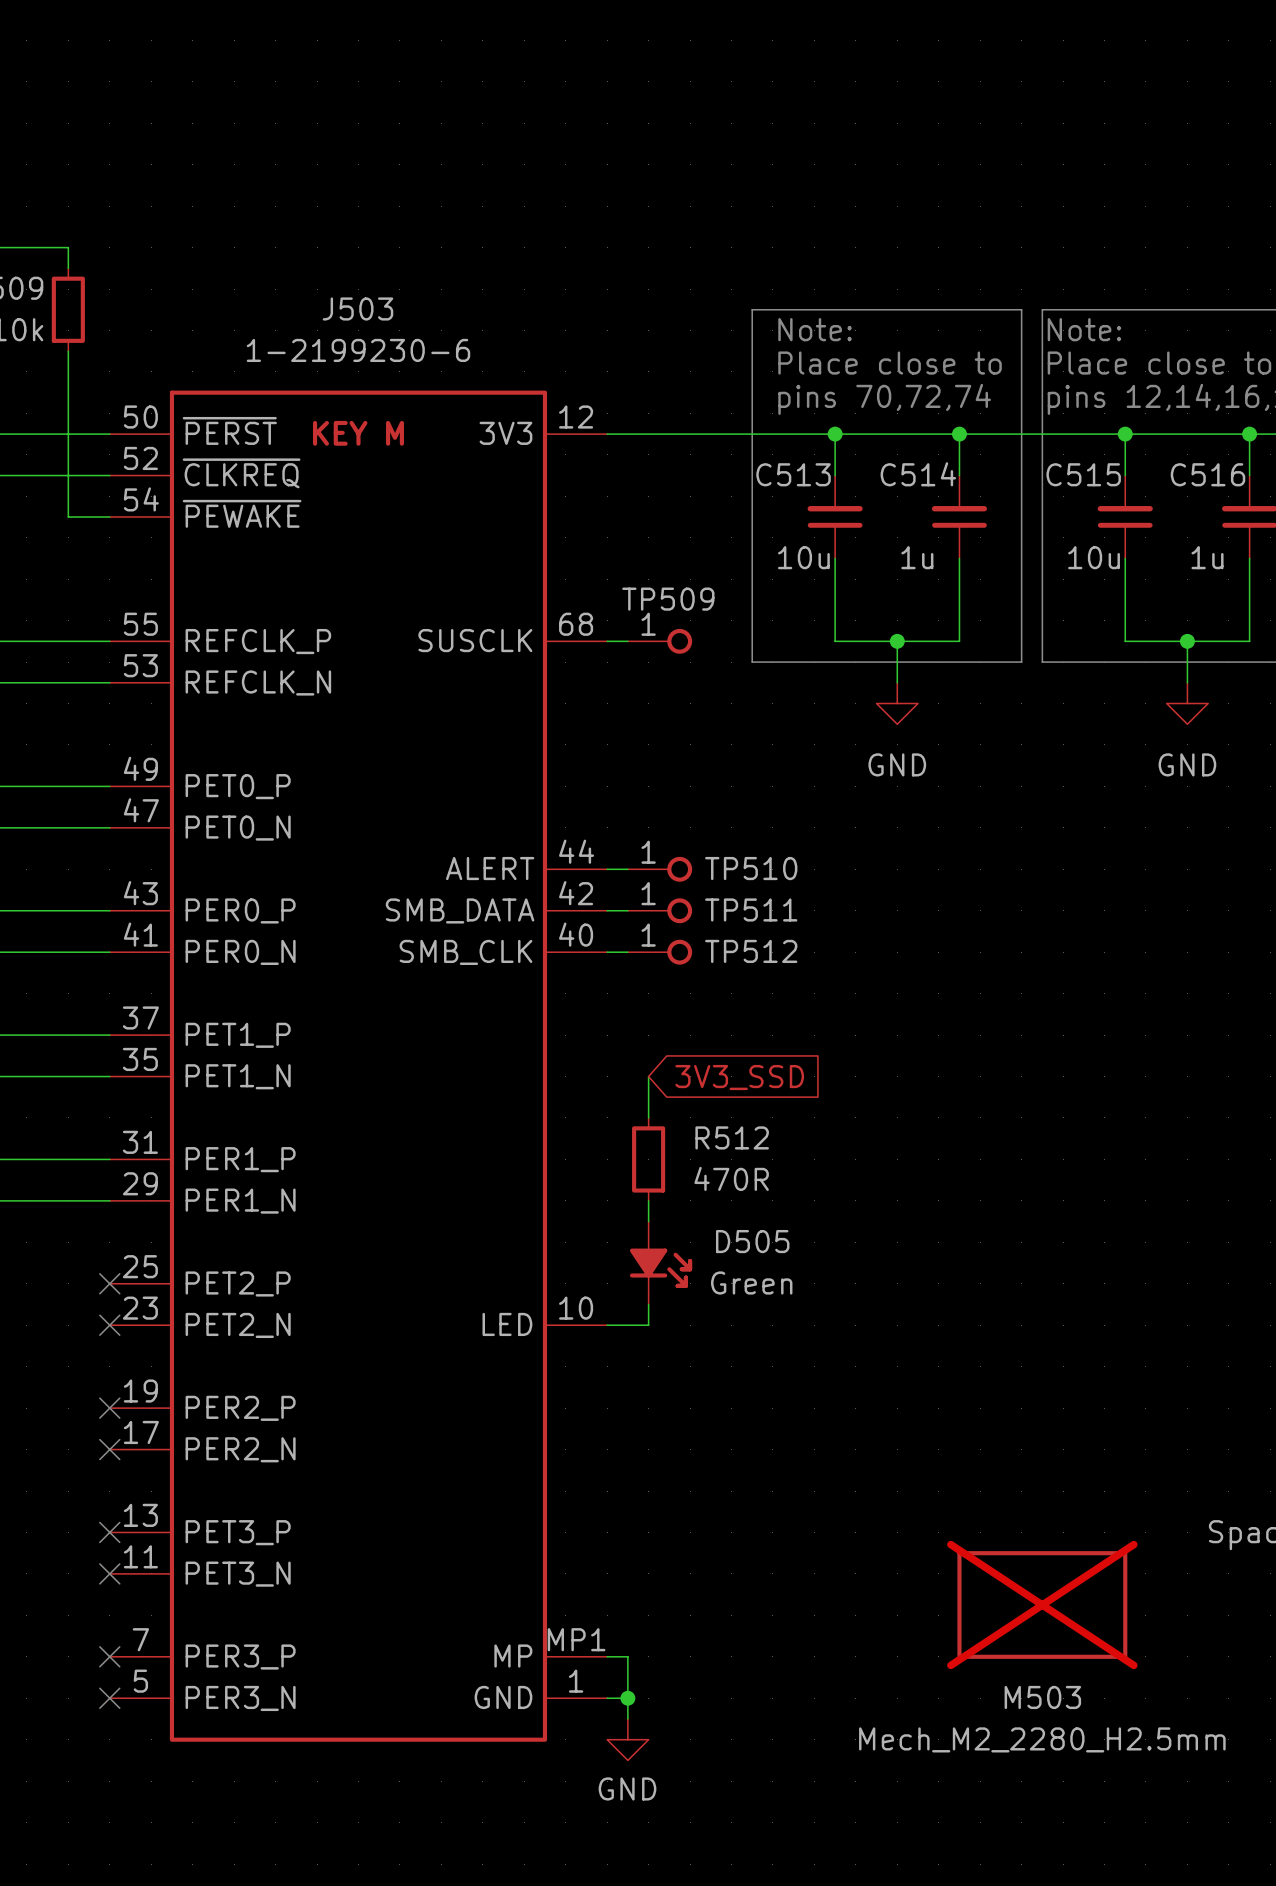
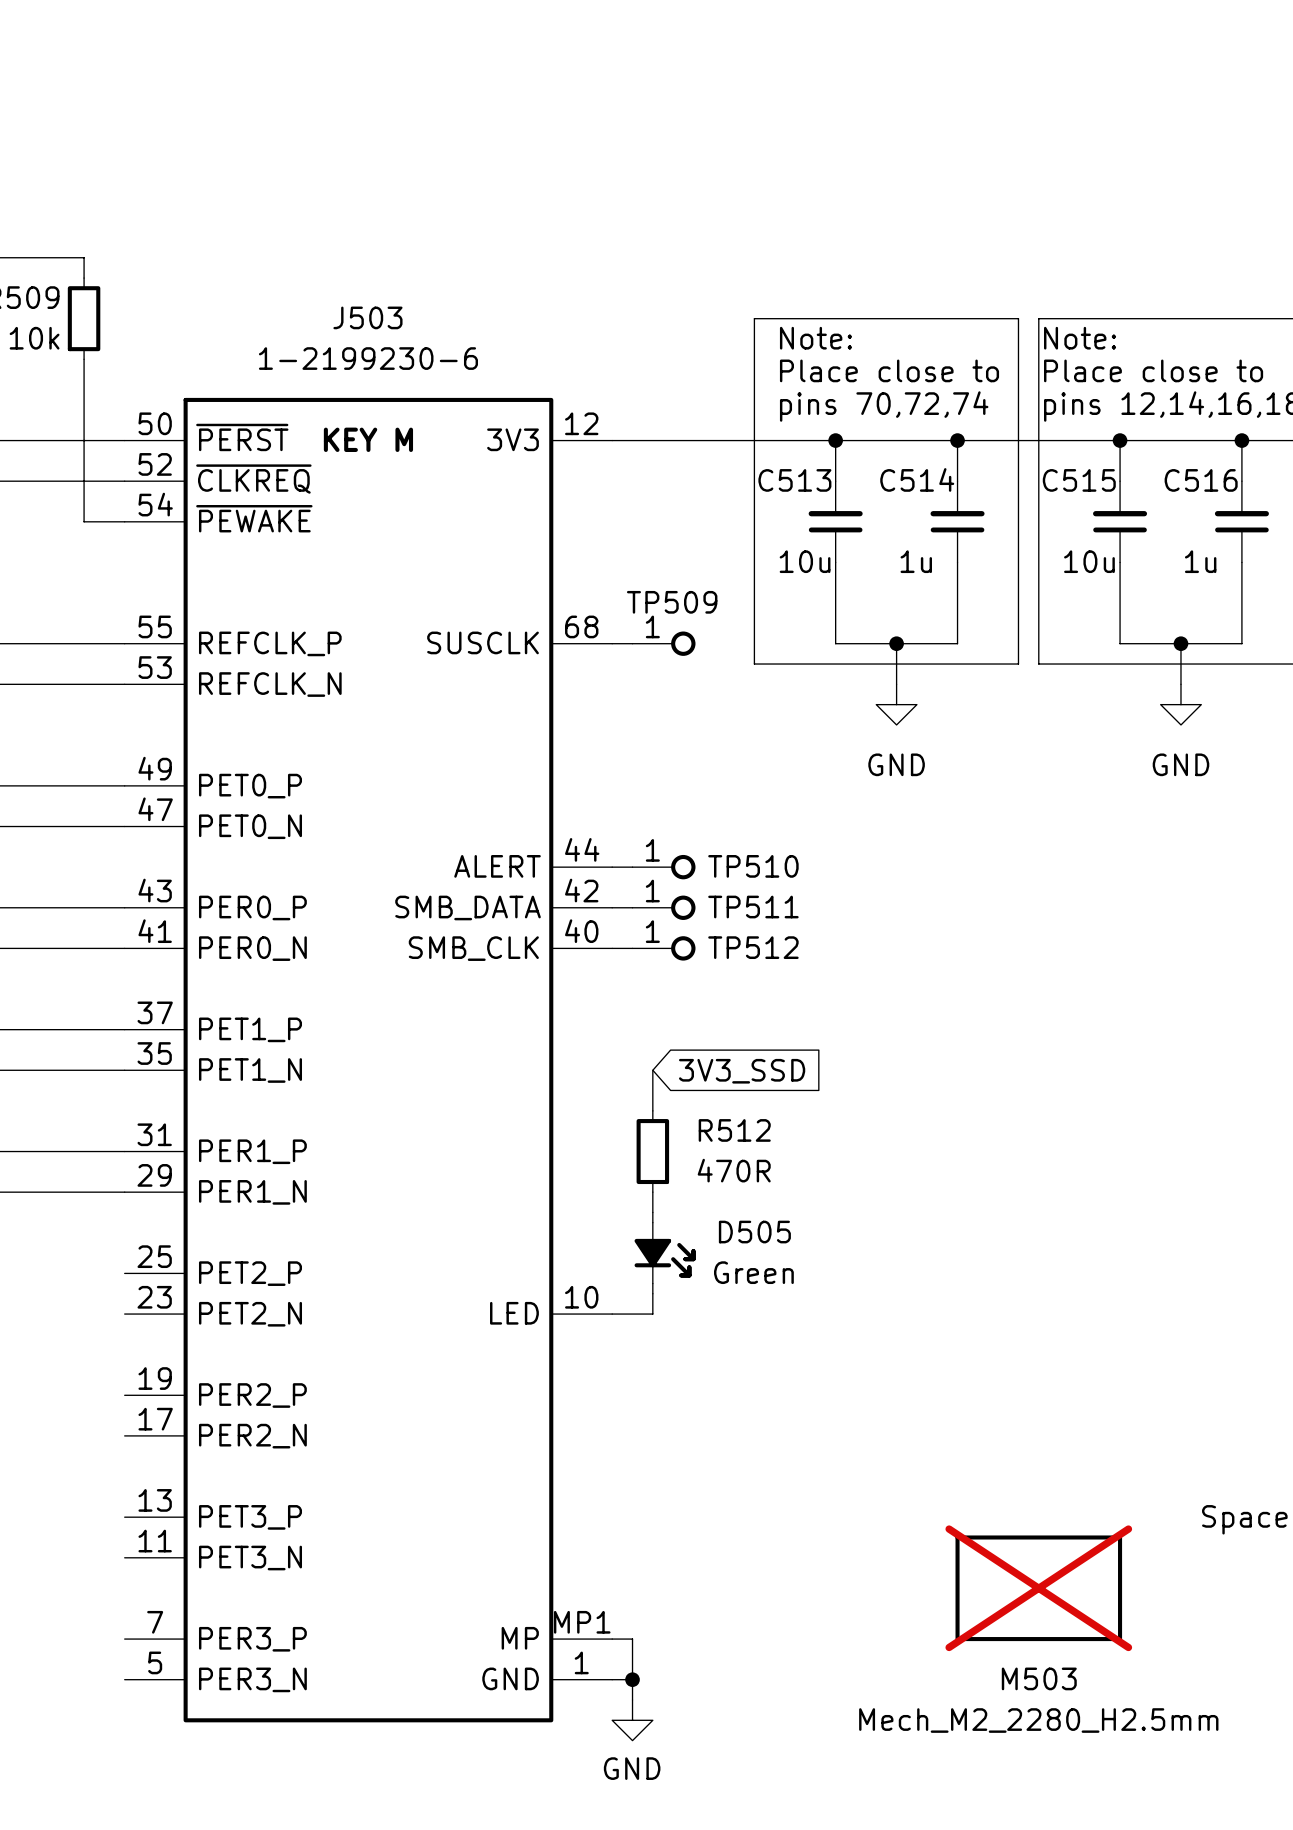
no-connect mark: (109, 1283) -> none
no-connect mark: (109, 1325) -> none
no-connect mark: (109, 1408) -> none
no-connect mark: (109, 1449) -> none
no-connect mark: (109, 1532) -> none
no-connect mark: (109, 1573) -> none
no-connect mark: (109, 1656) -> none
no-connect mark: (109, 1698) -> none

